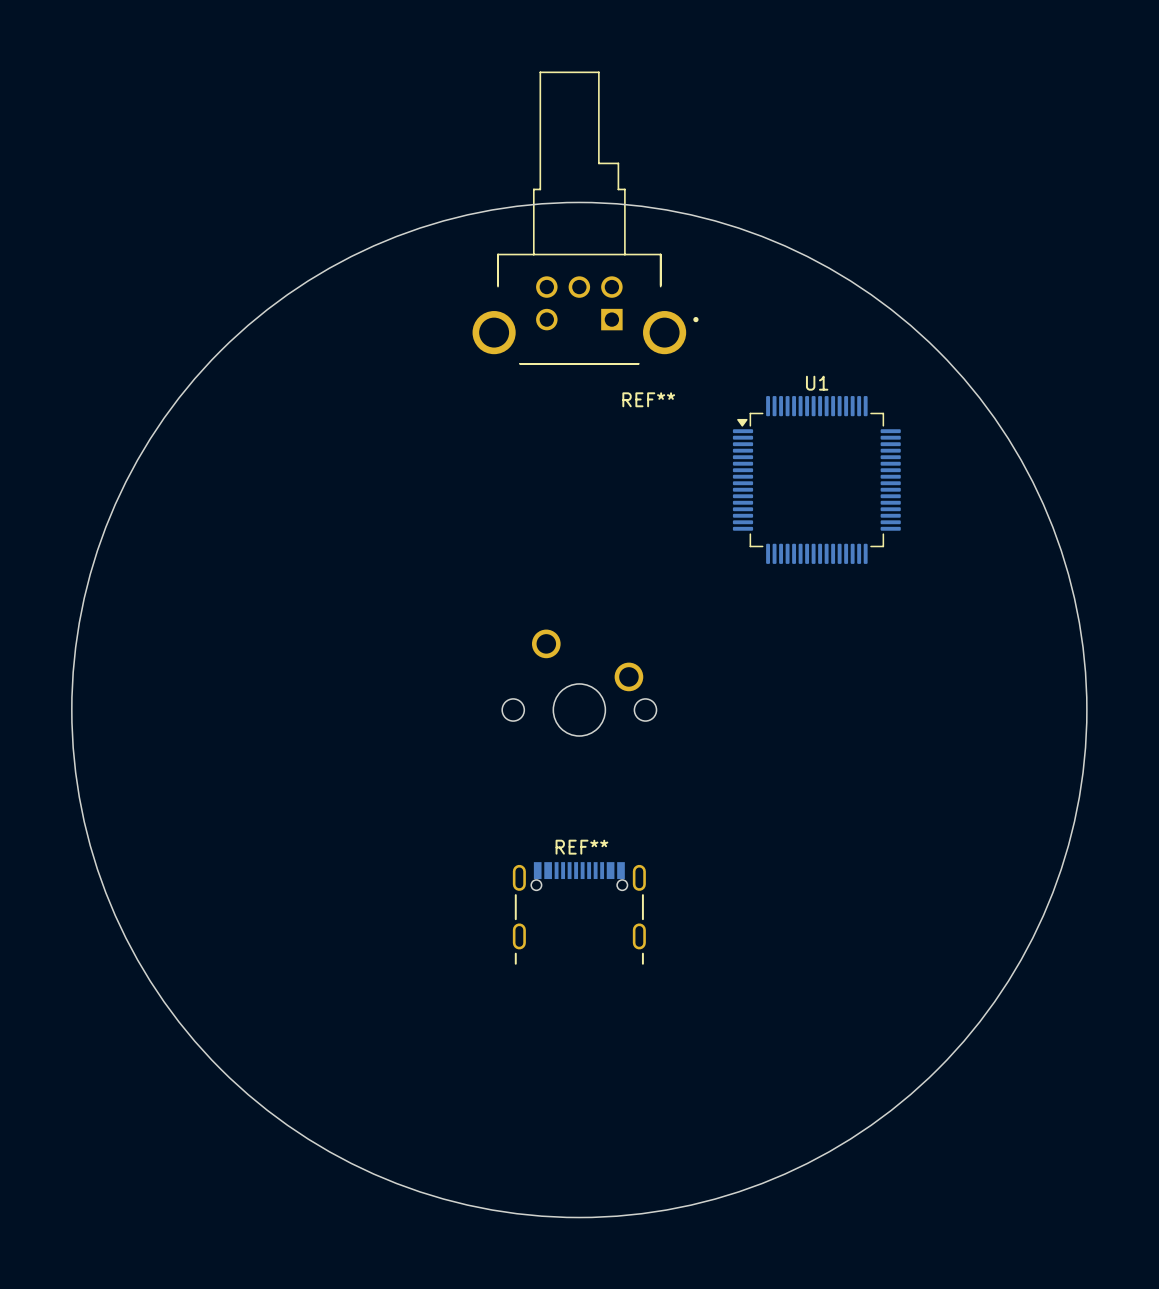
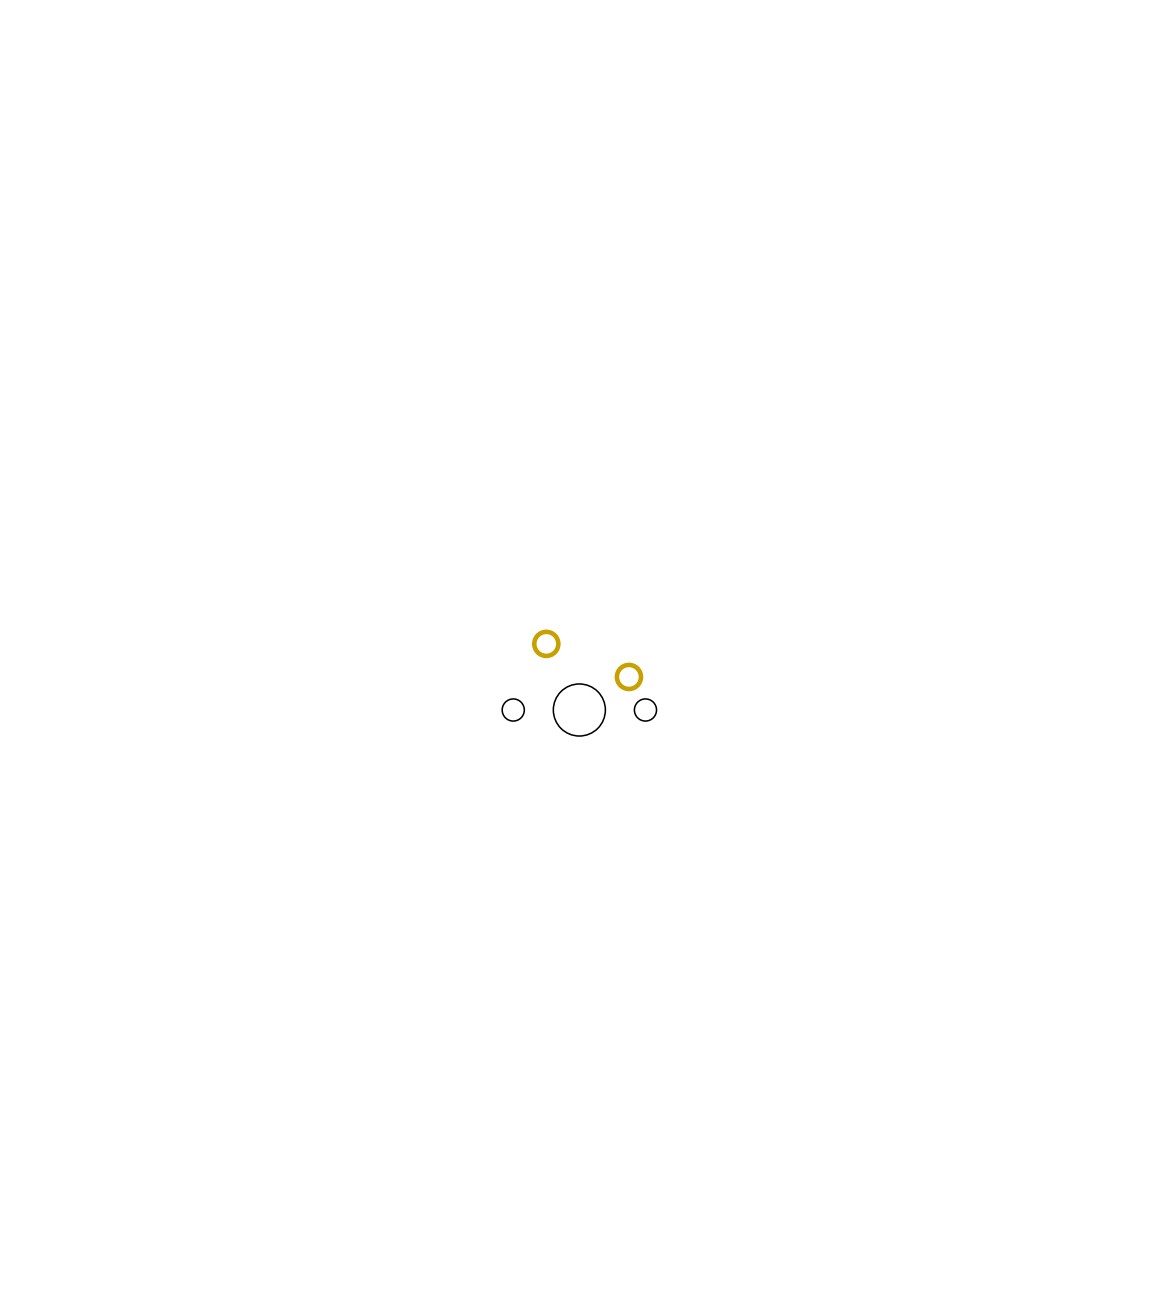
round board edge: [71, 202, 1088, 1218] -> none
REF**: (585, 218) -> none
U1: (816, 479) -> none
REF**: (579, 913) -> none

